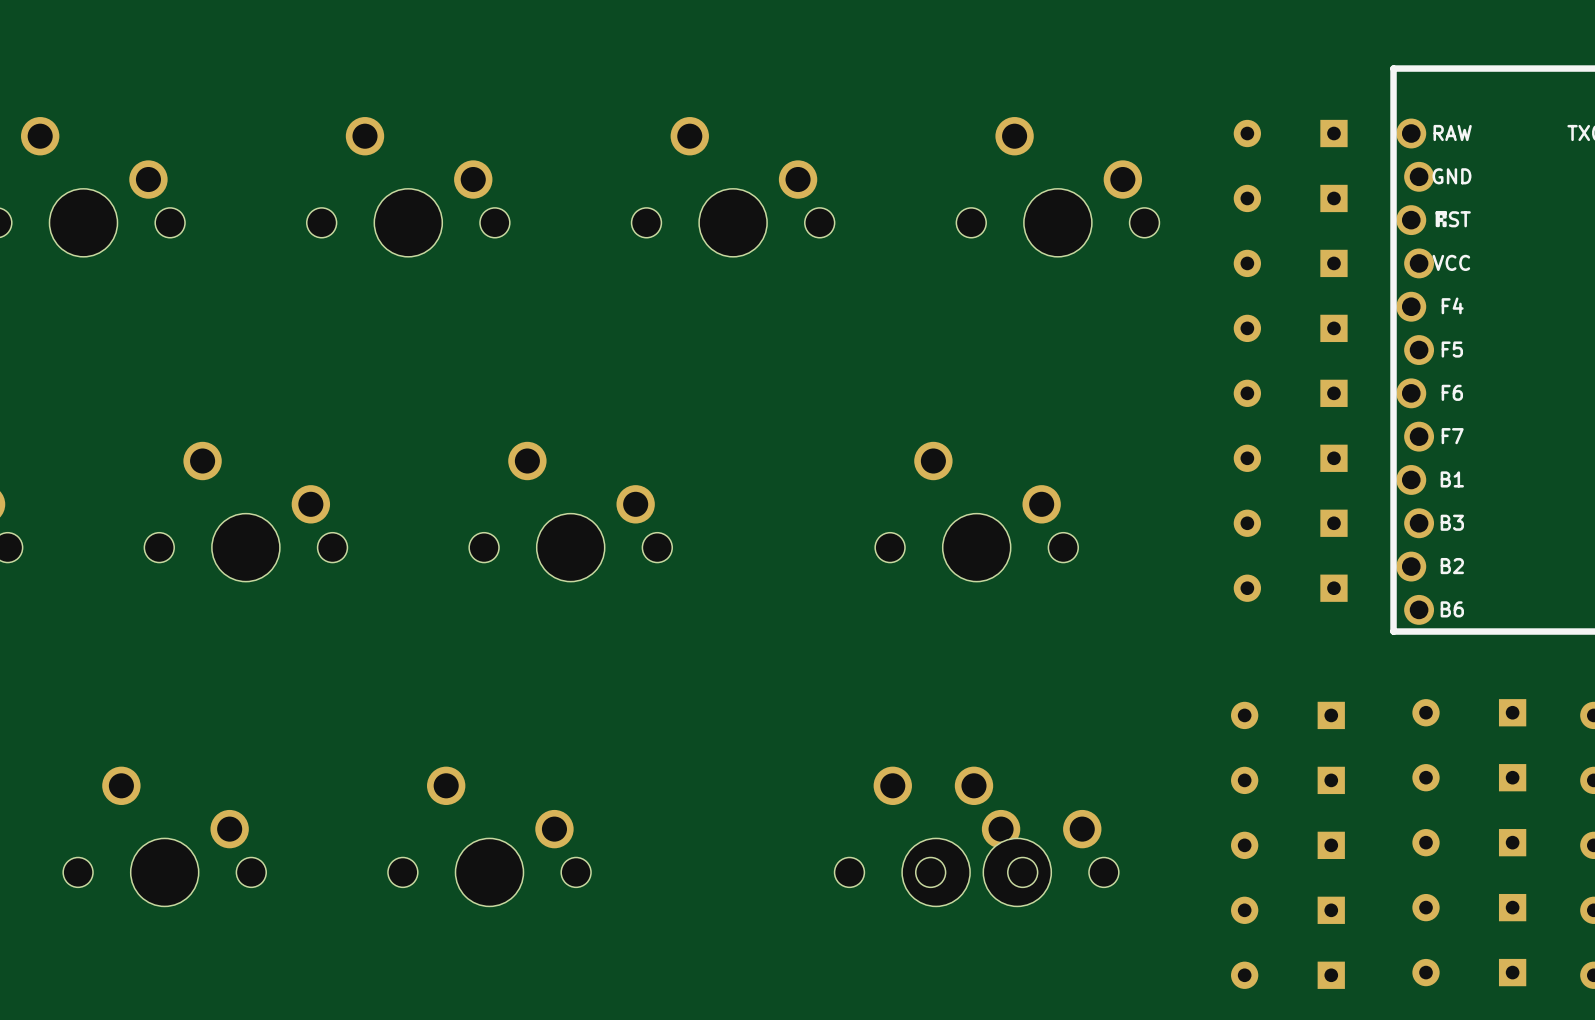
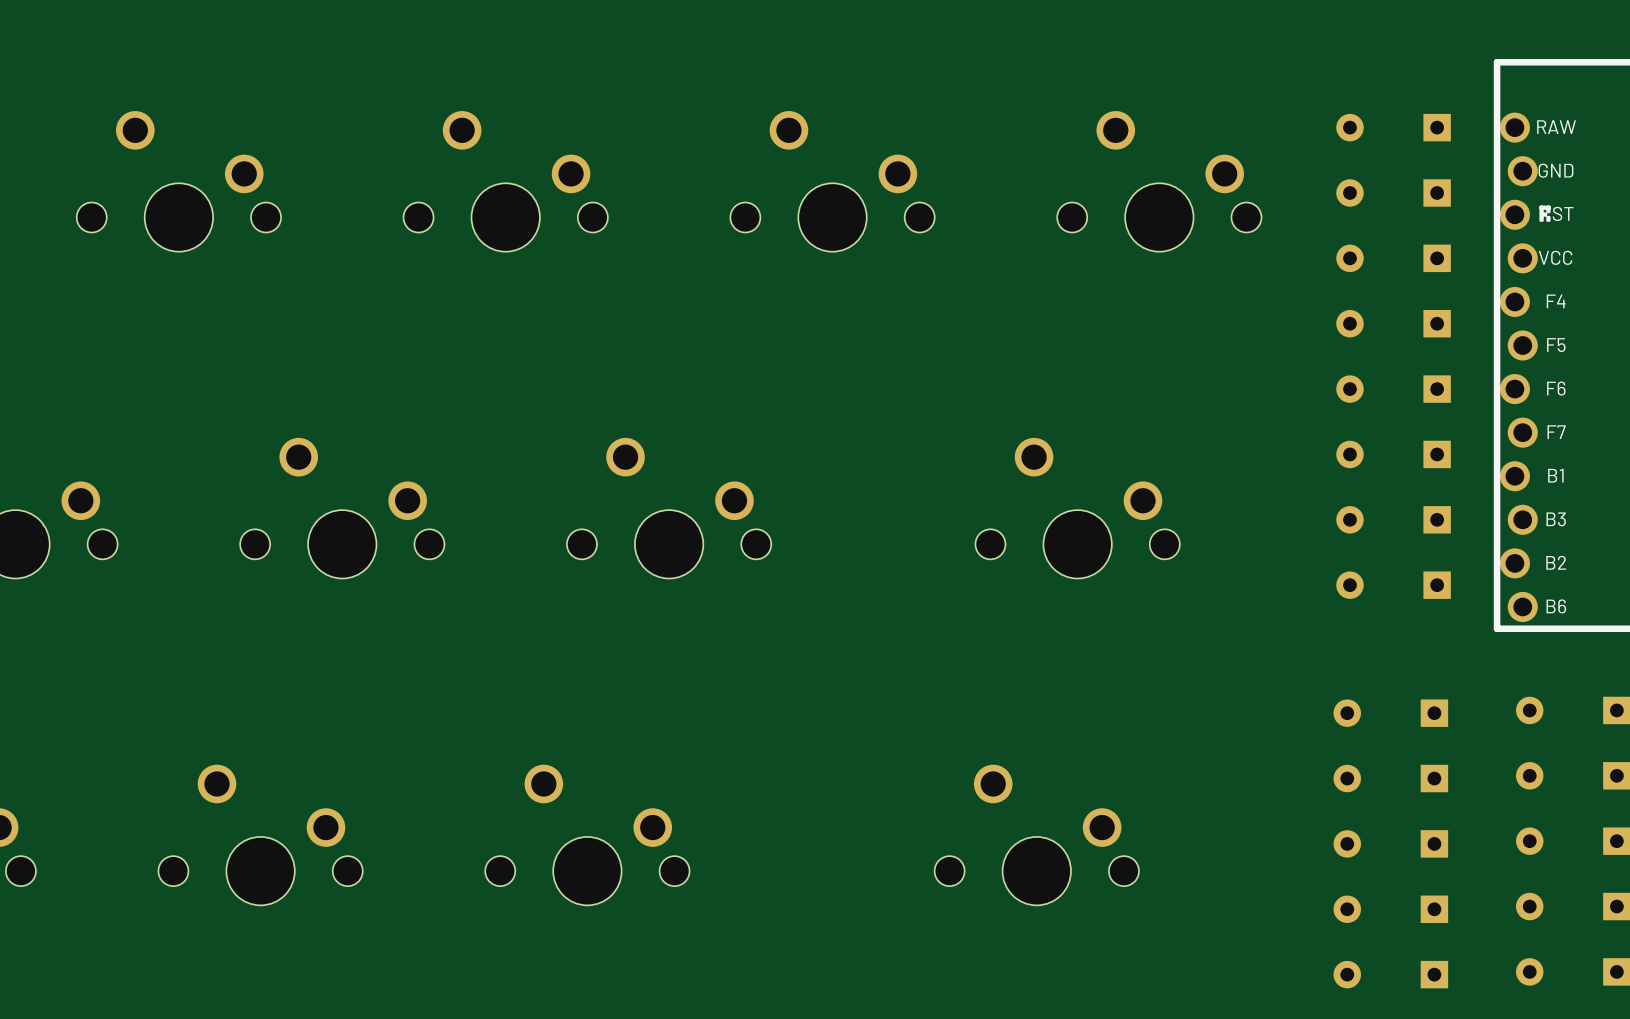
part: (1017, 836) -> none

